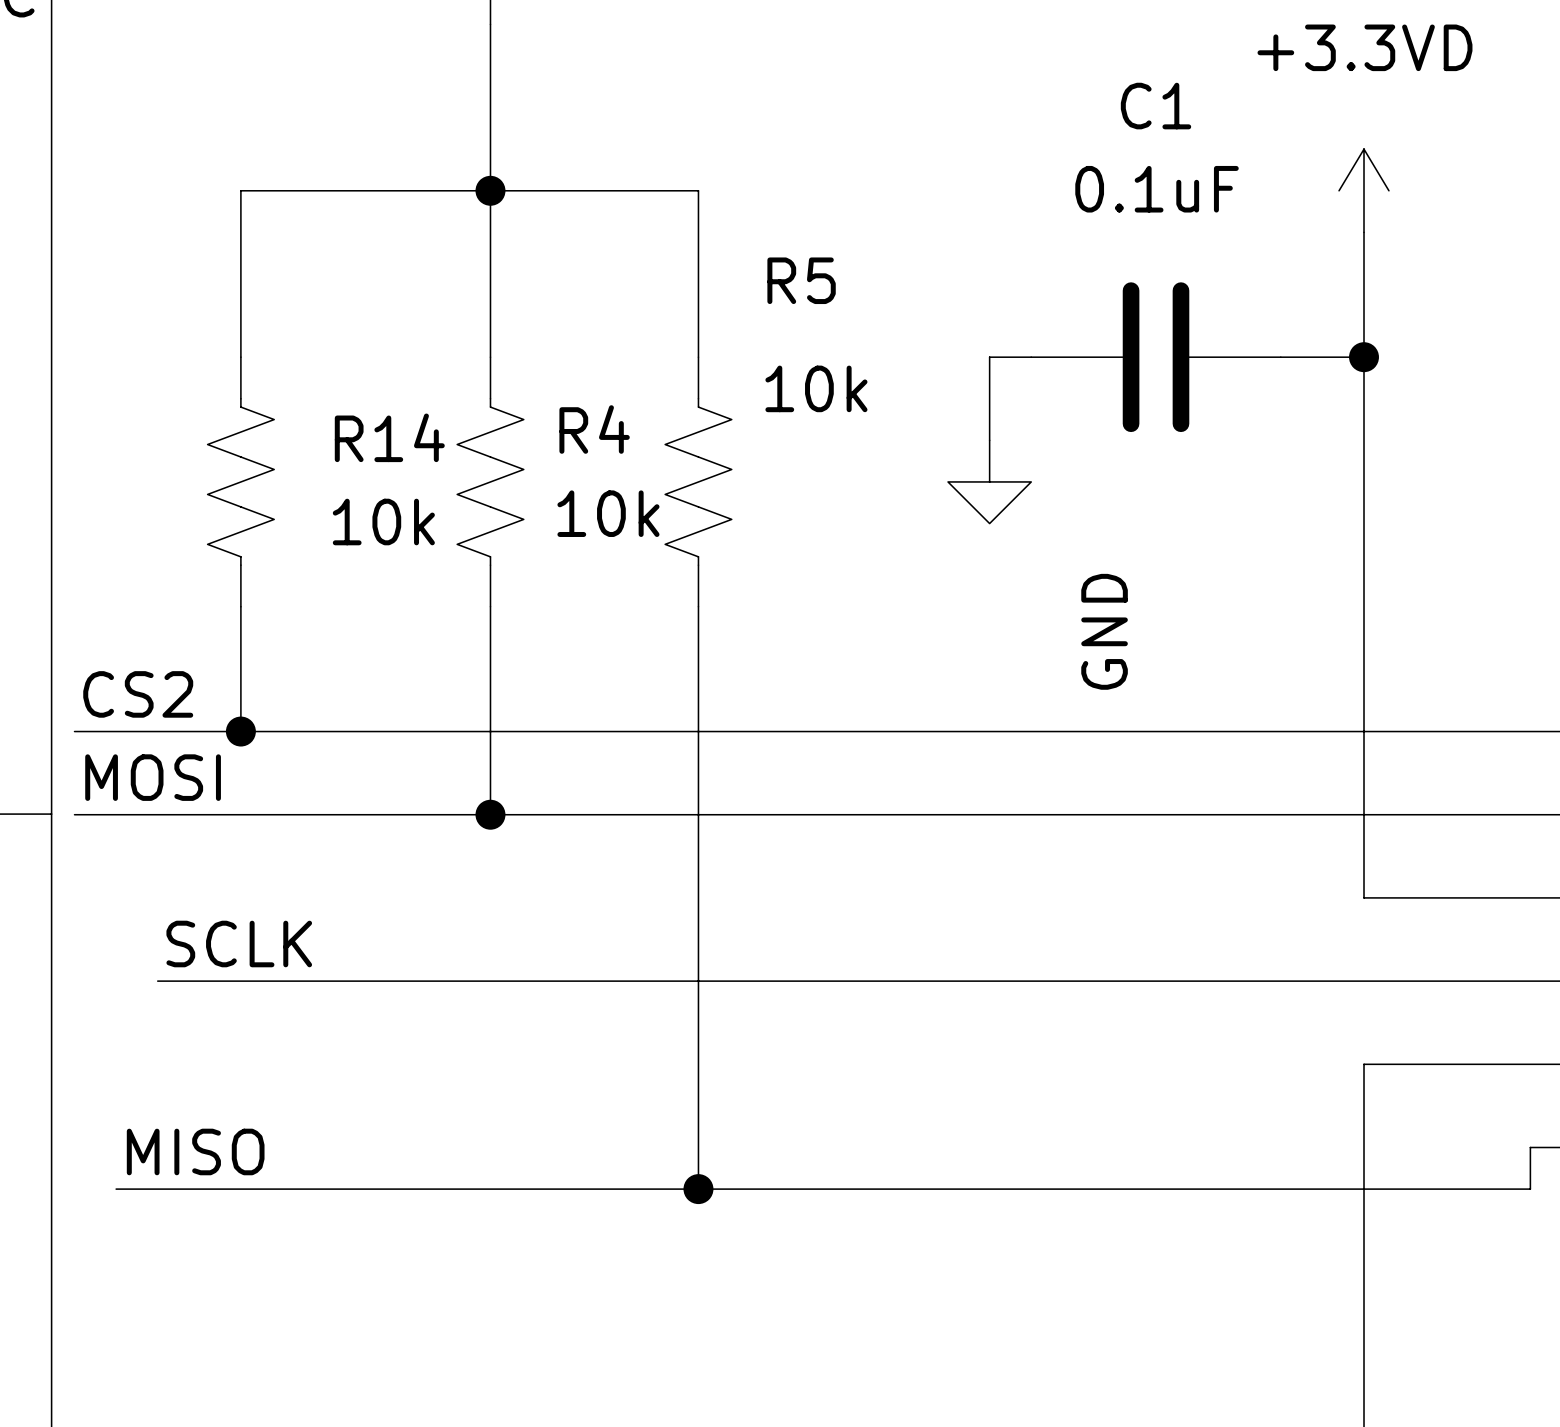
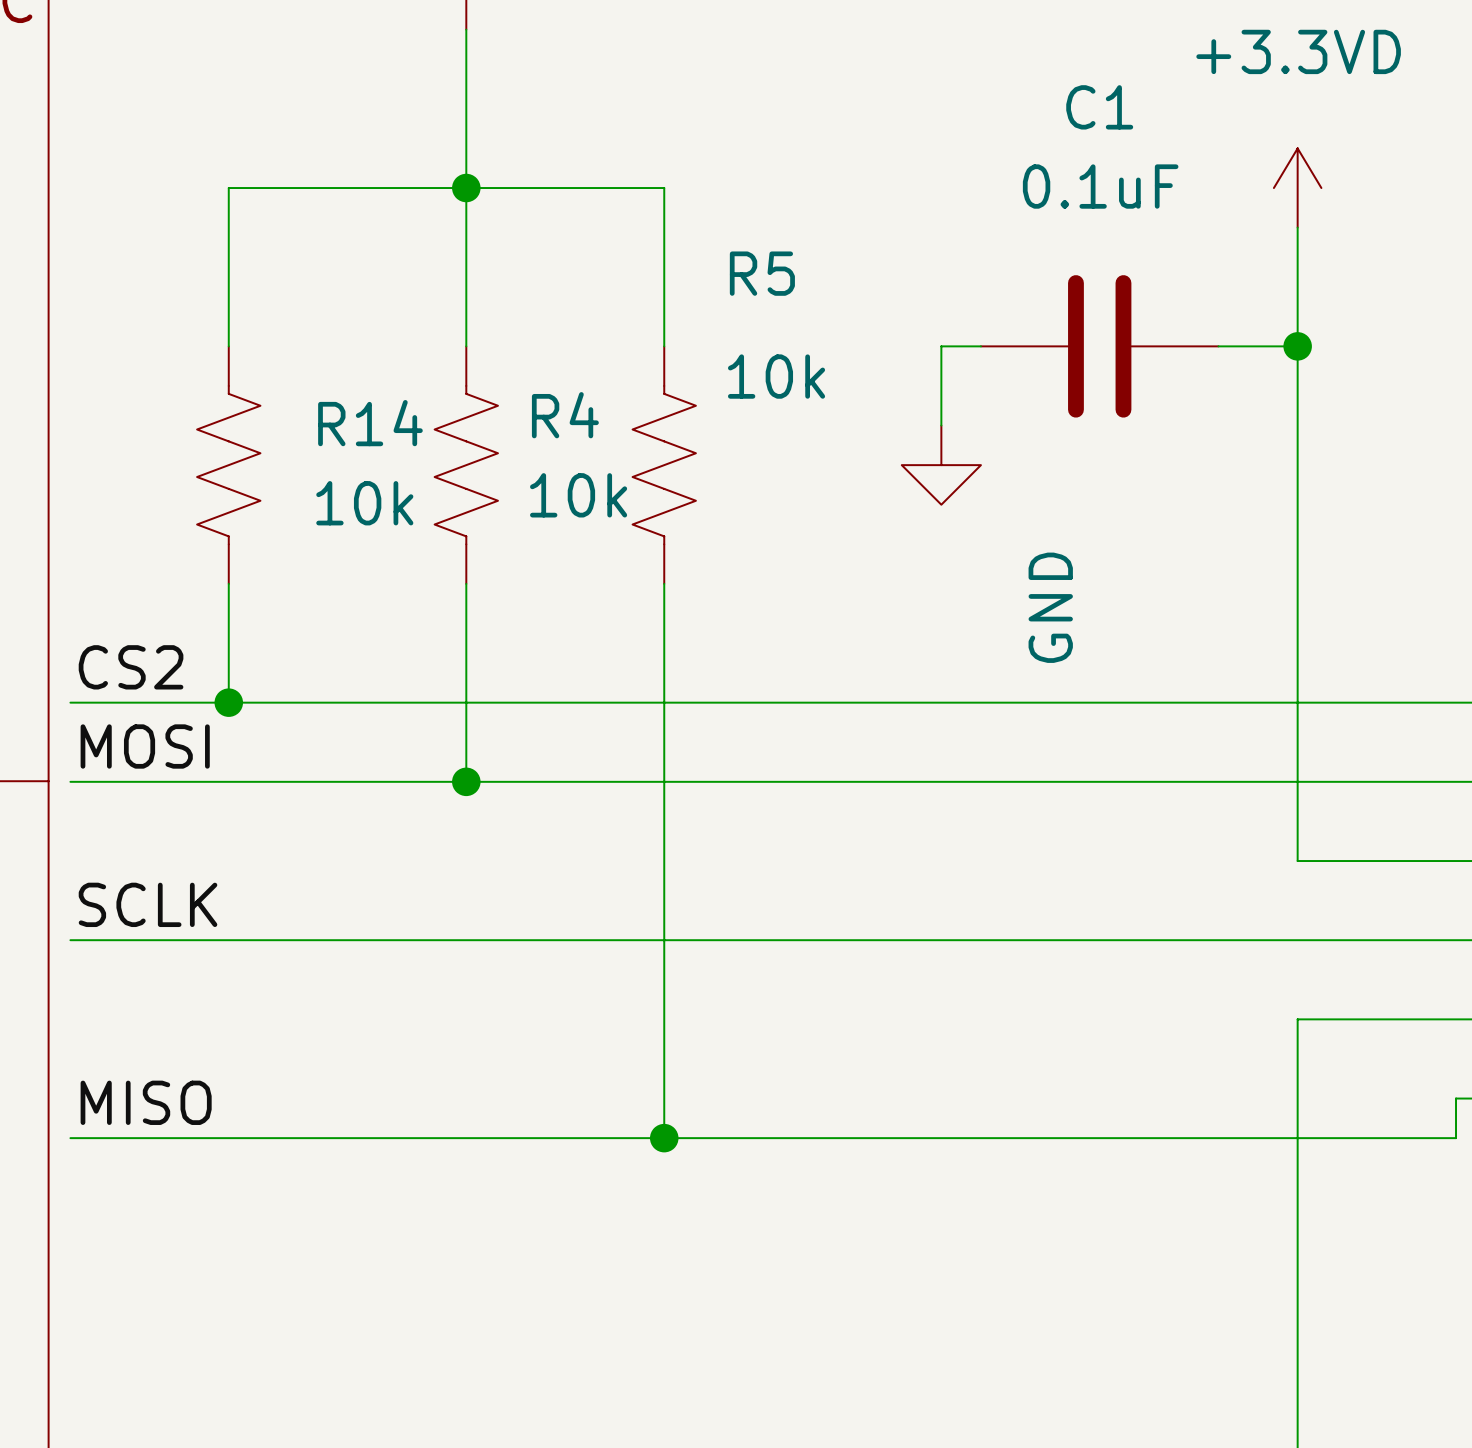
label position: SCLK (239, 944) -> SCLK (148, 904)
wire: none -> (70, 940) (149, 940)
label position: MISO (195, 1151) -> MISO (146, 1102)
wire: none -> (70, 1138) (110, 1138)

